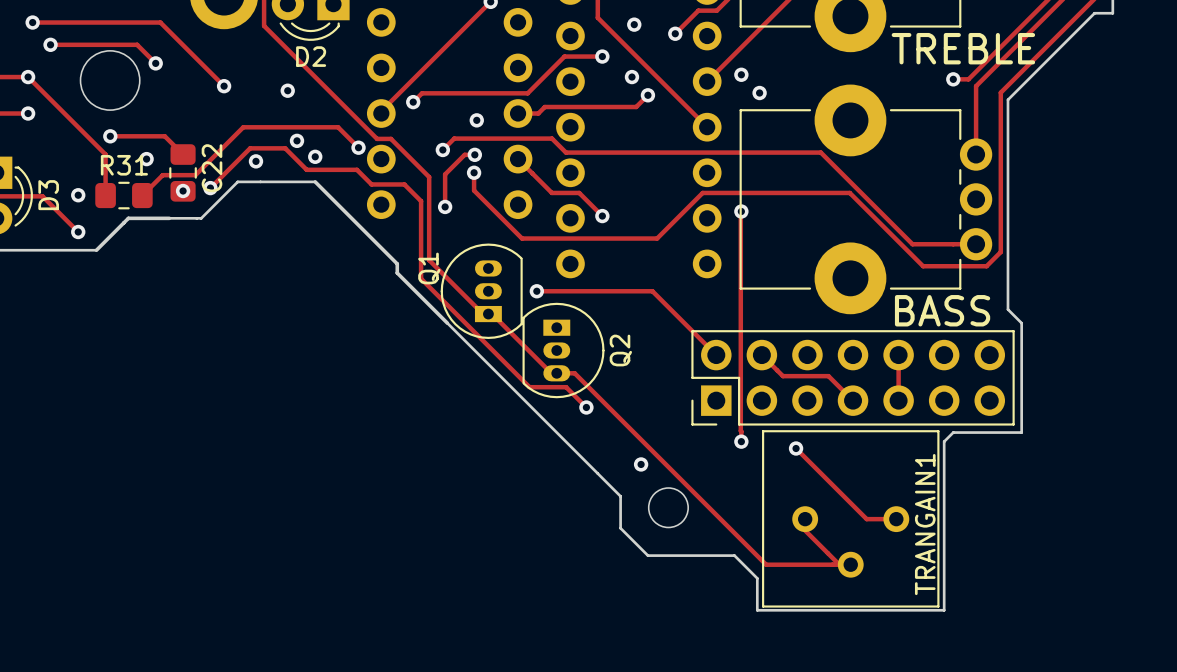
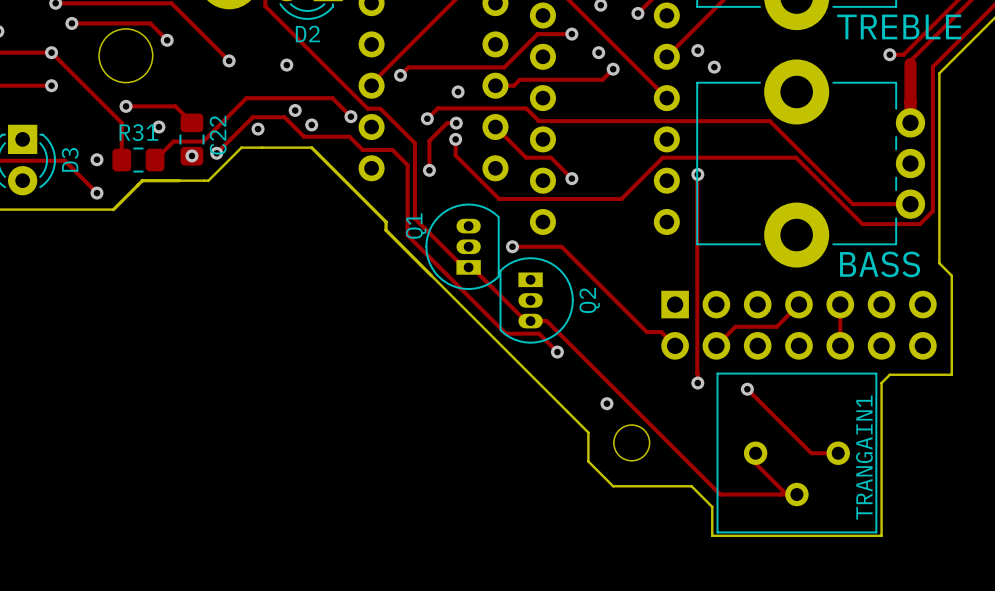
track width: thin (976, 89) (976, 154) -> thick (910, 64) (910, 122)
track: (590, 291) (652, 291) (716, 355) -> (561, 246) (646, 332) (661, 332) (675, 345)
track: (761, 355) (782, 376) (828, 376) (853, 400) -> none
track: none -> (798, 304) (776, 326) (735, 326) (716, 345)
part side: top (853, 377) -> bottom (798, 325)

